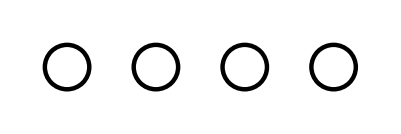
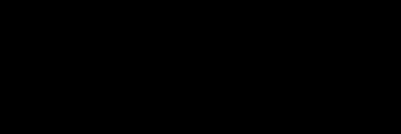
part: (67, 67) -> none
part: (155, 67) -> none
part: (244, 67) -> none
part: (333, 67) -> none

